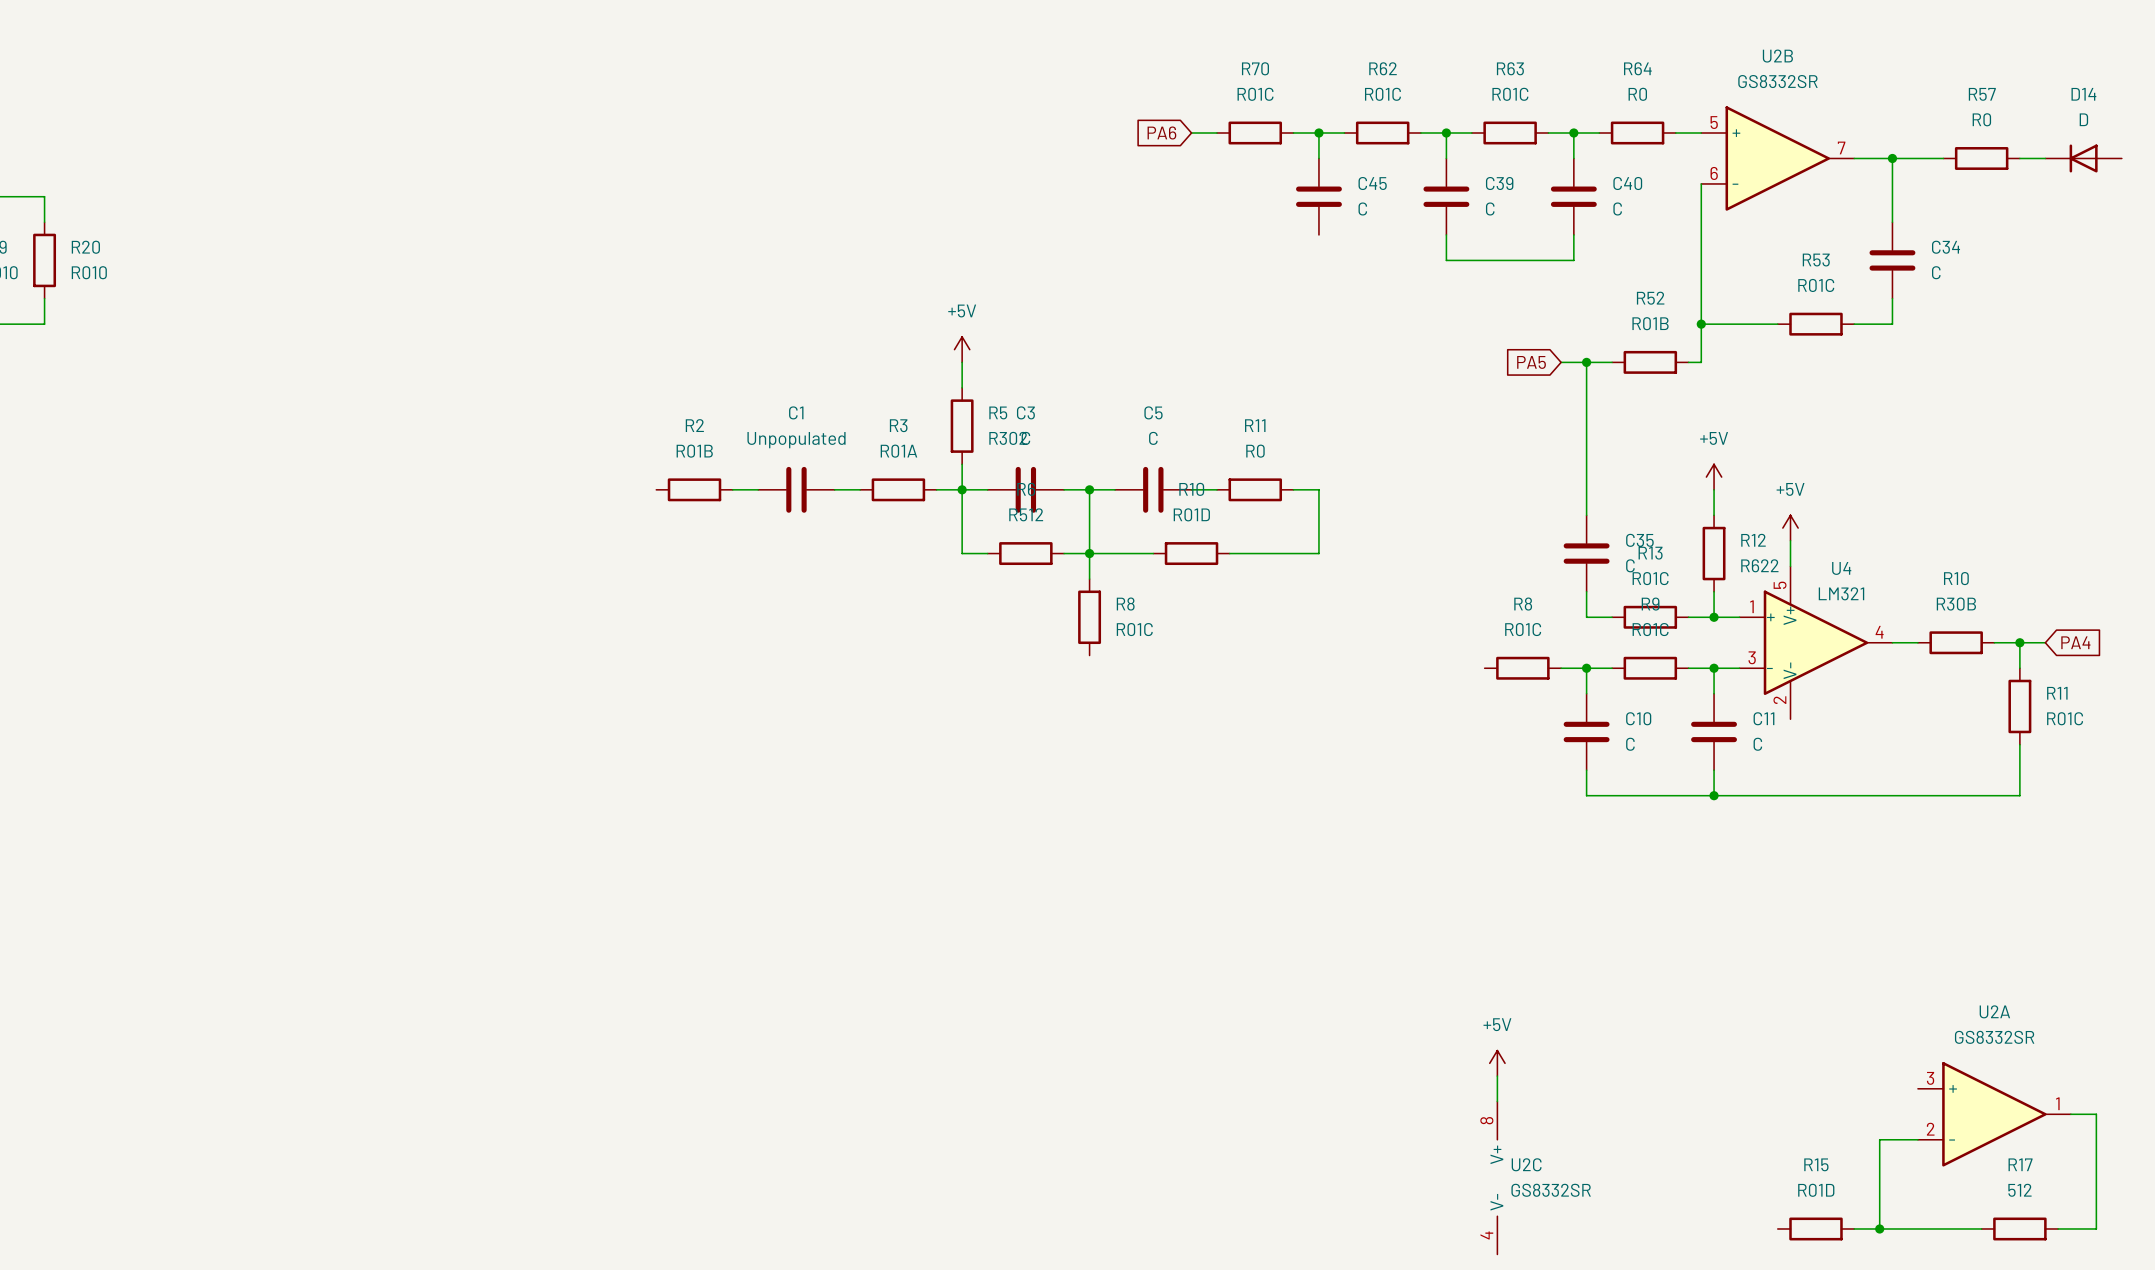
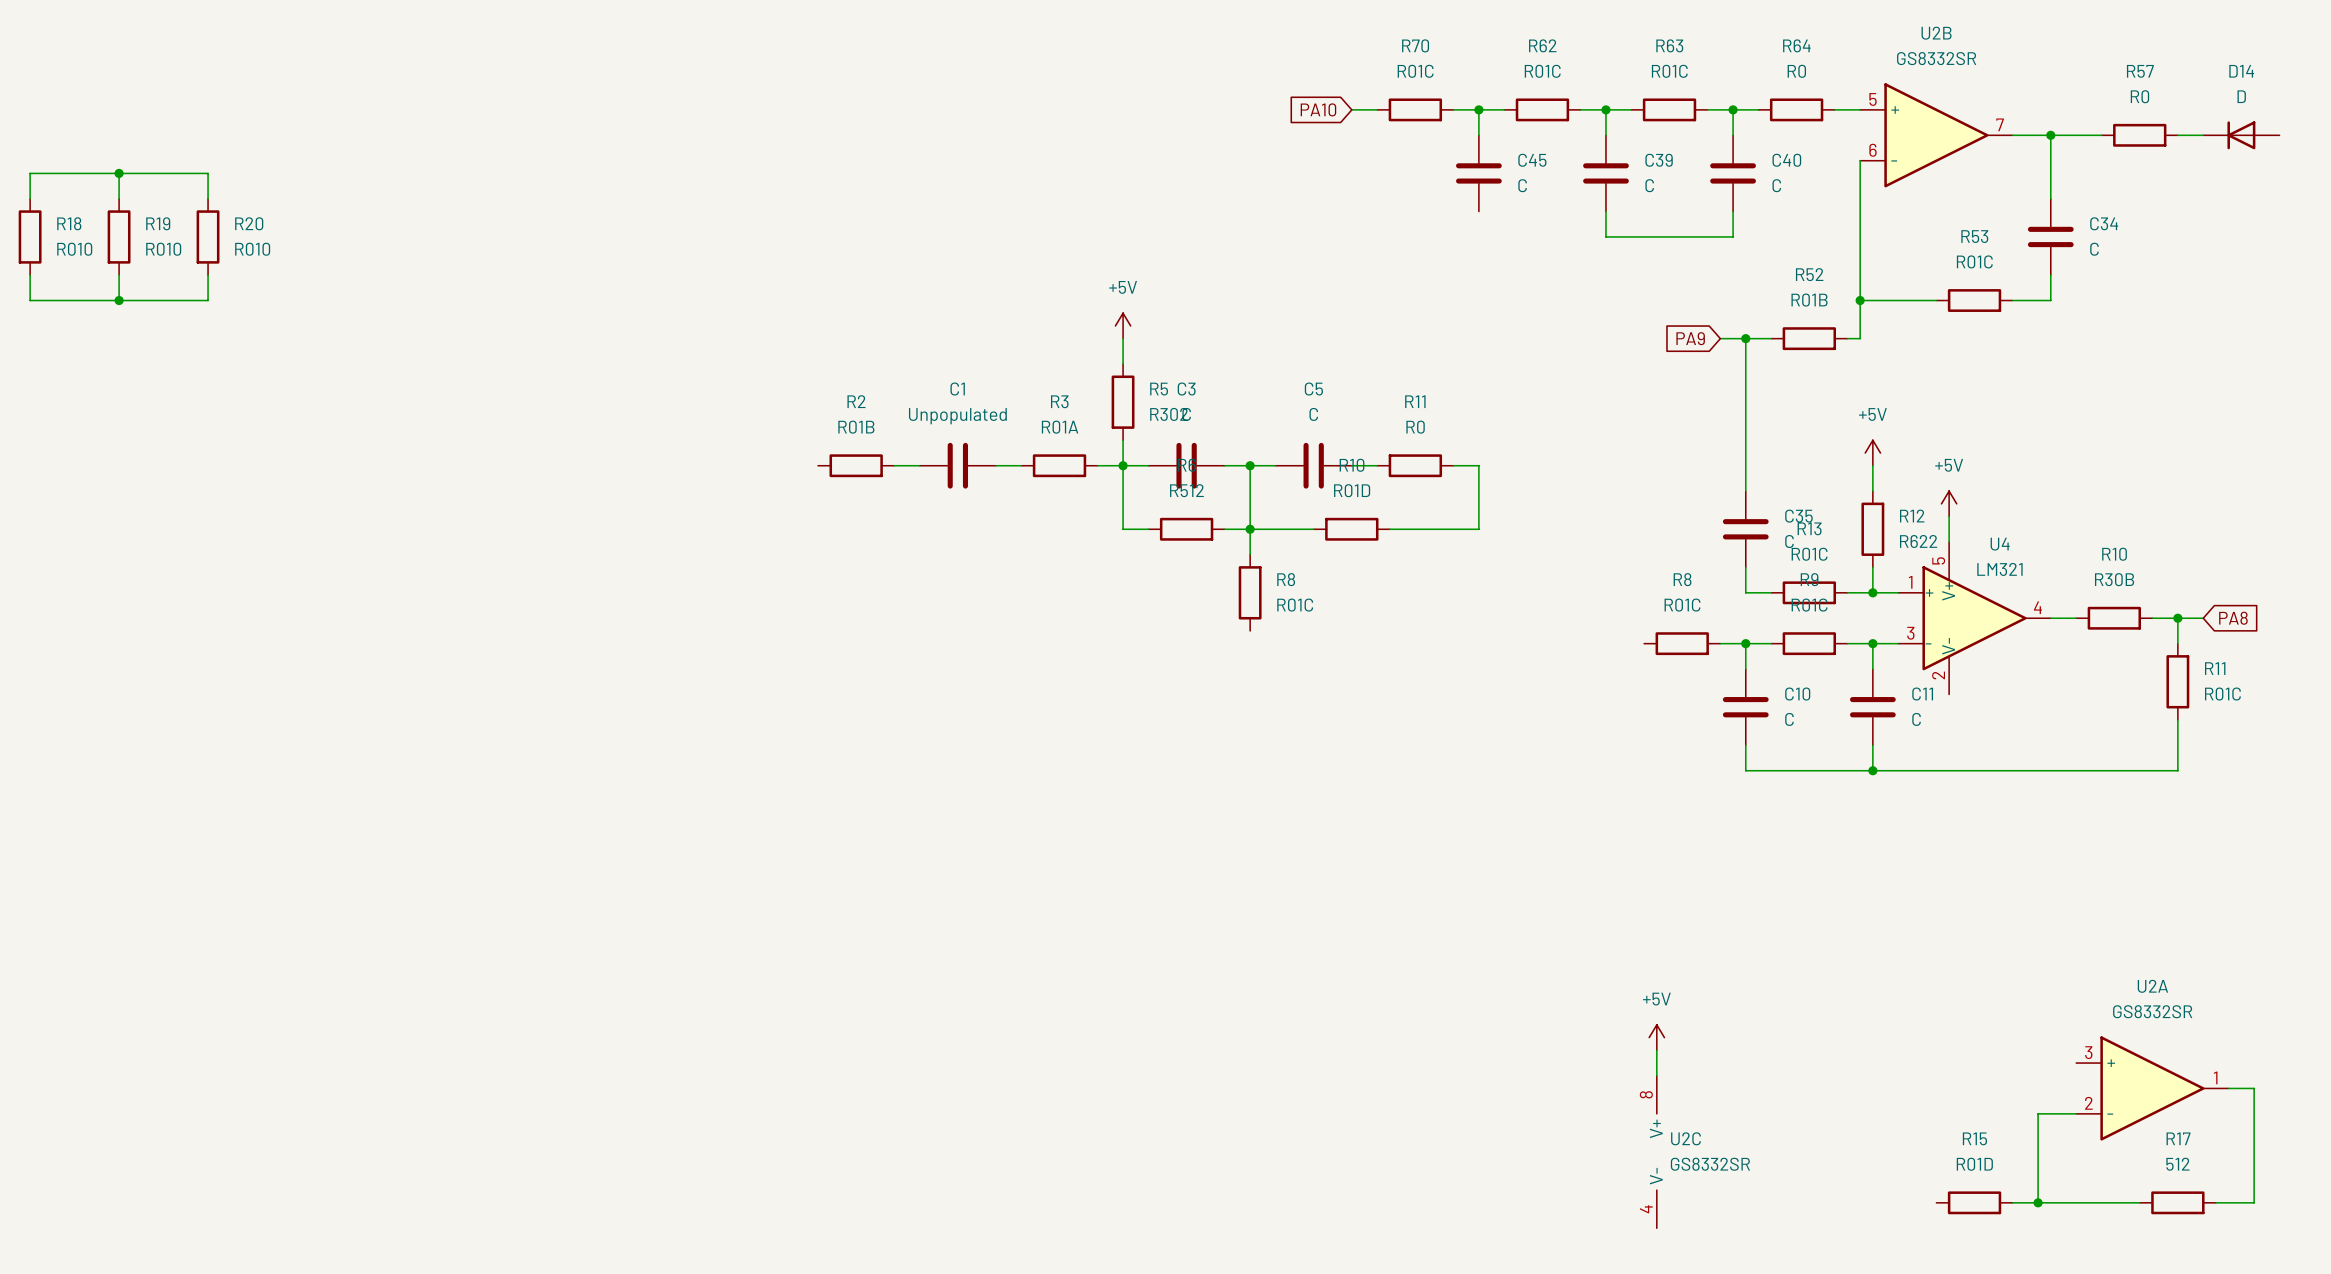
global label: PA6 (1161, 132) -> PA10 (1318, 109)
global label: PA5 (1531, 362) -> PA9 (1690, 338)
global label: PA4 (2075, 642) -> PA8 (2233, 618)

